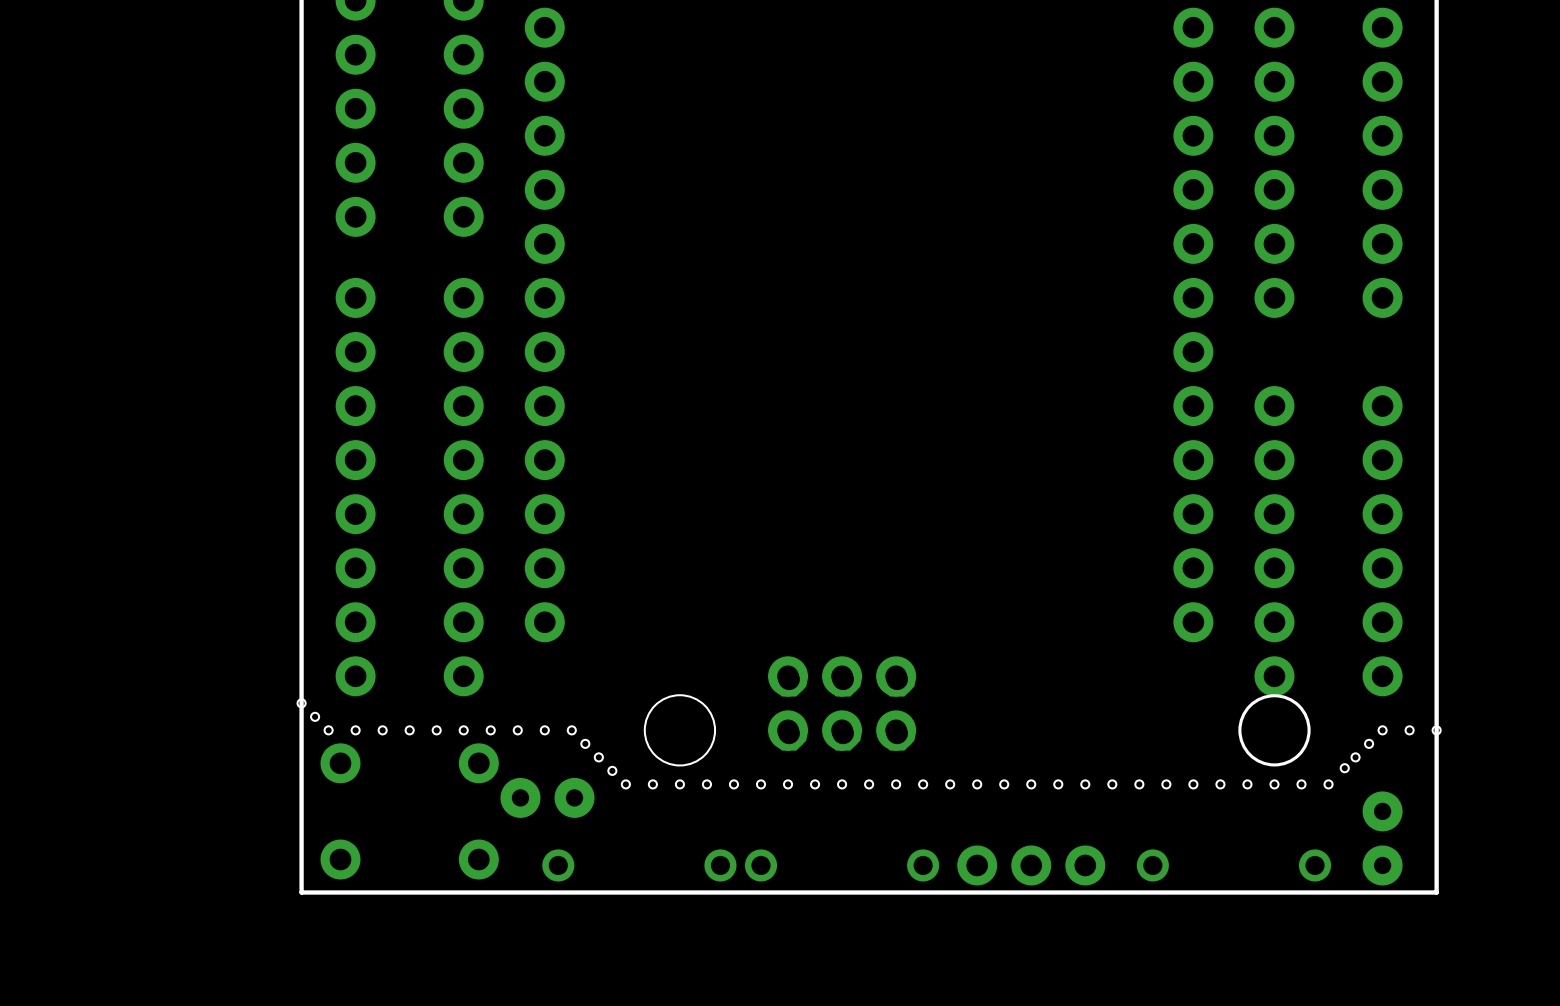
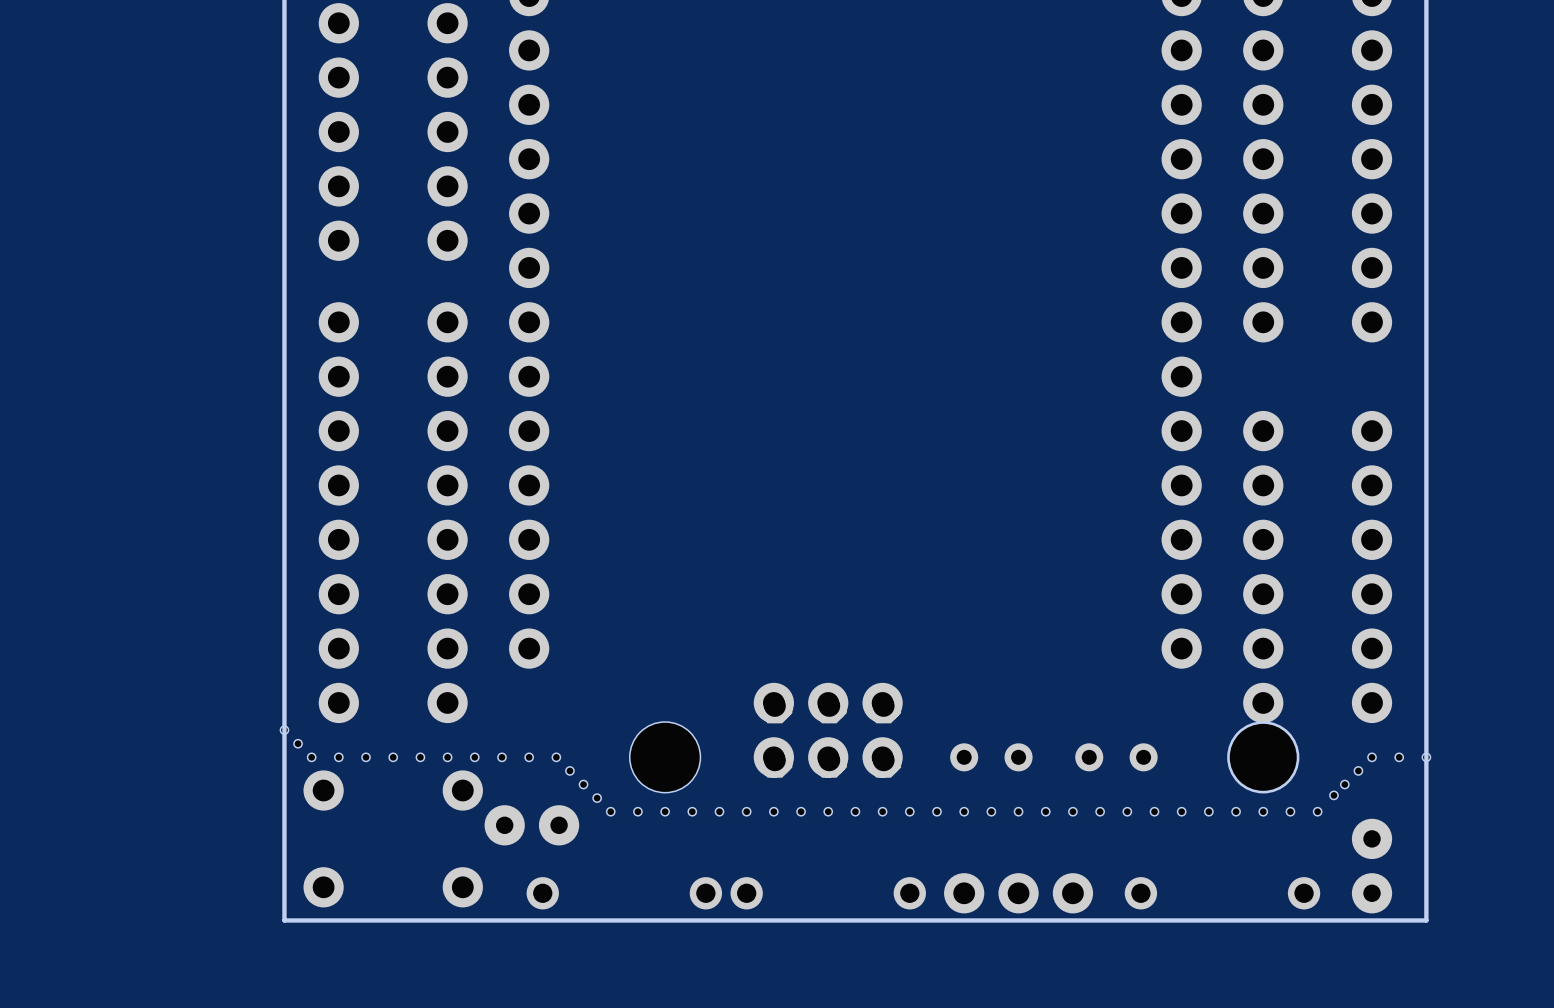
part: none -> (991, 757)
part: none -> (1116, 757)

